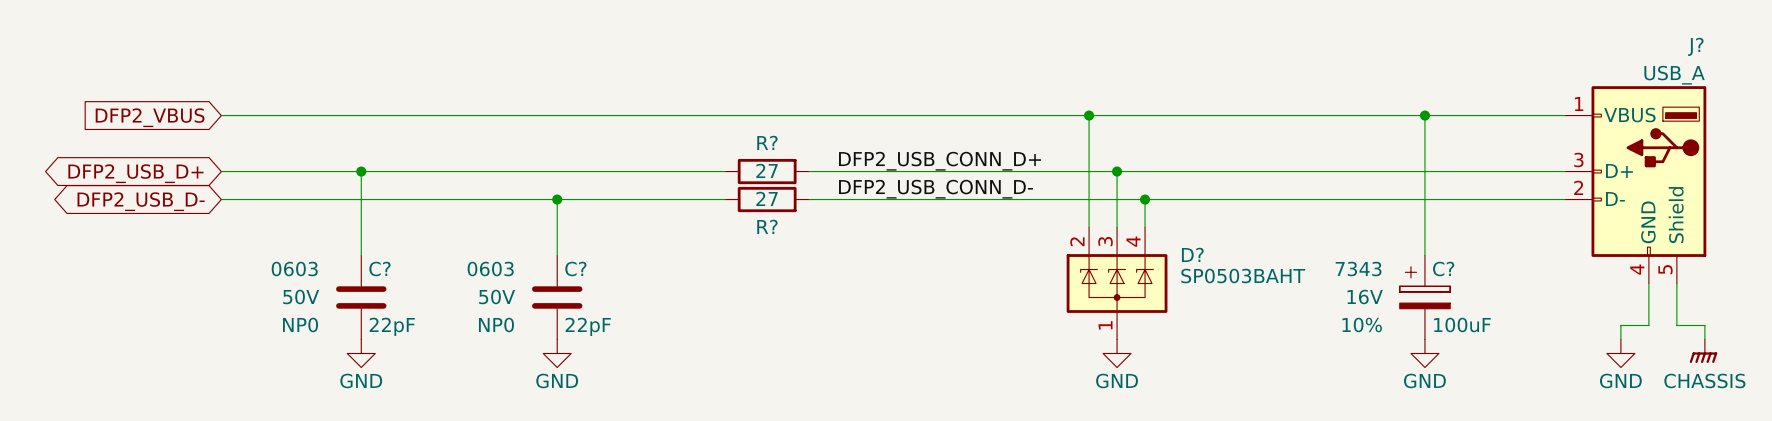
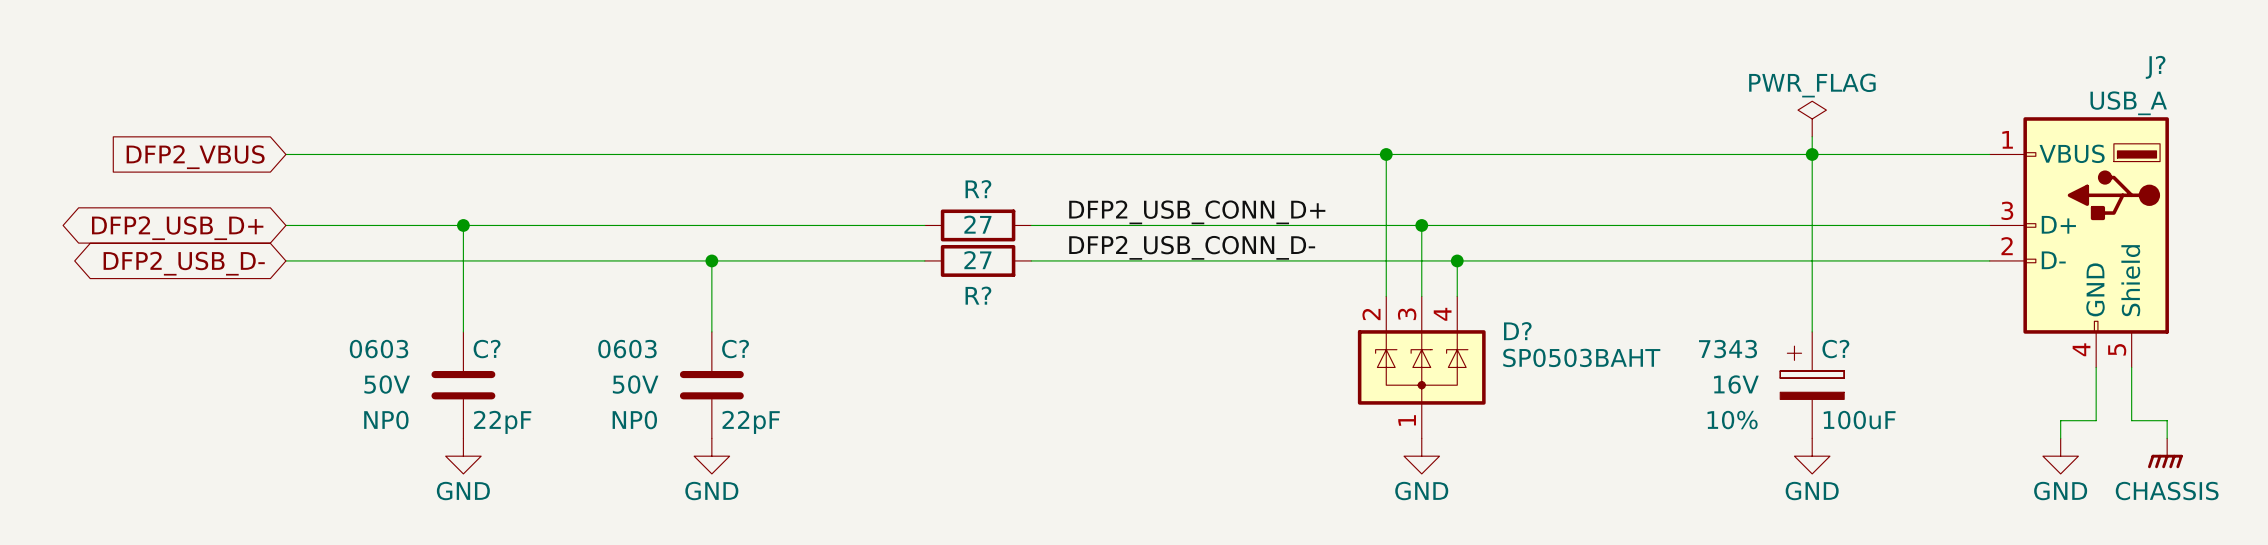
power symbol: none -> PWR_FLAG (1812, 118)
wire: none -> (1812, 136) (1812, 154)

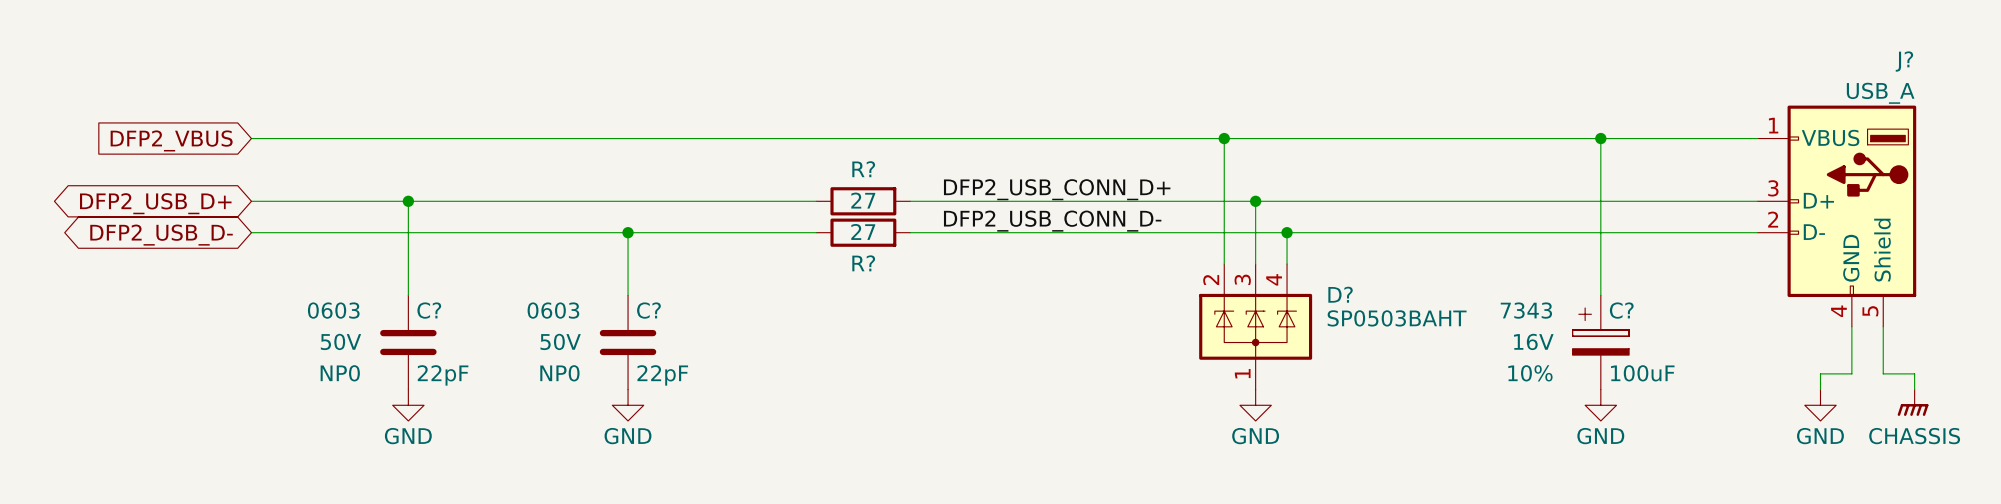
power symbol: PWR_FLAG (1812, 118) -> none
wire: (1812, 136) (1812, 154) -> none

